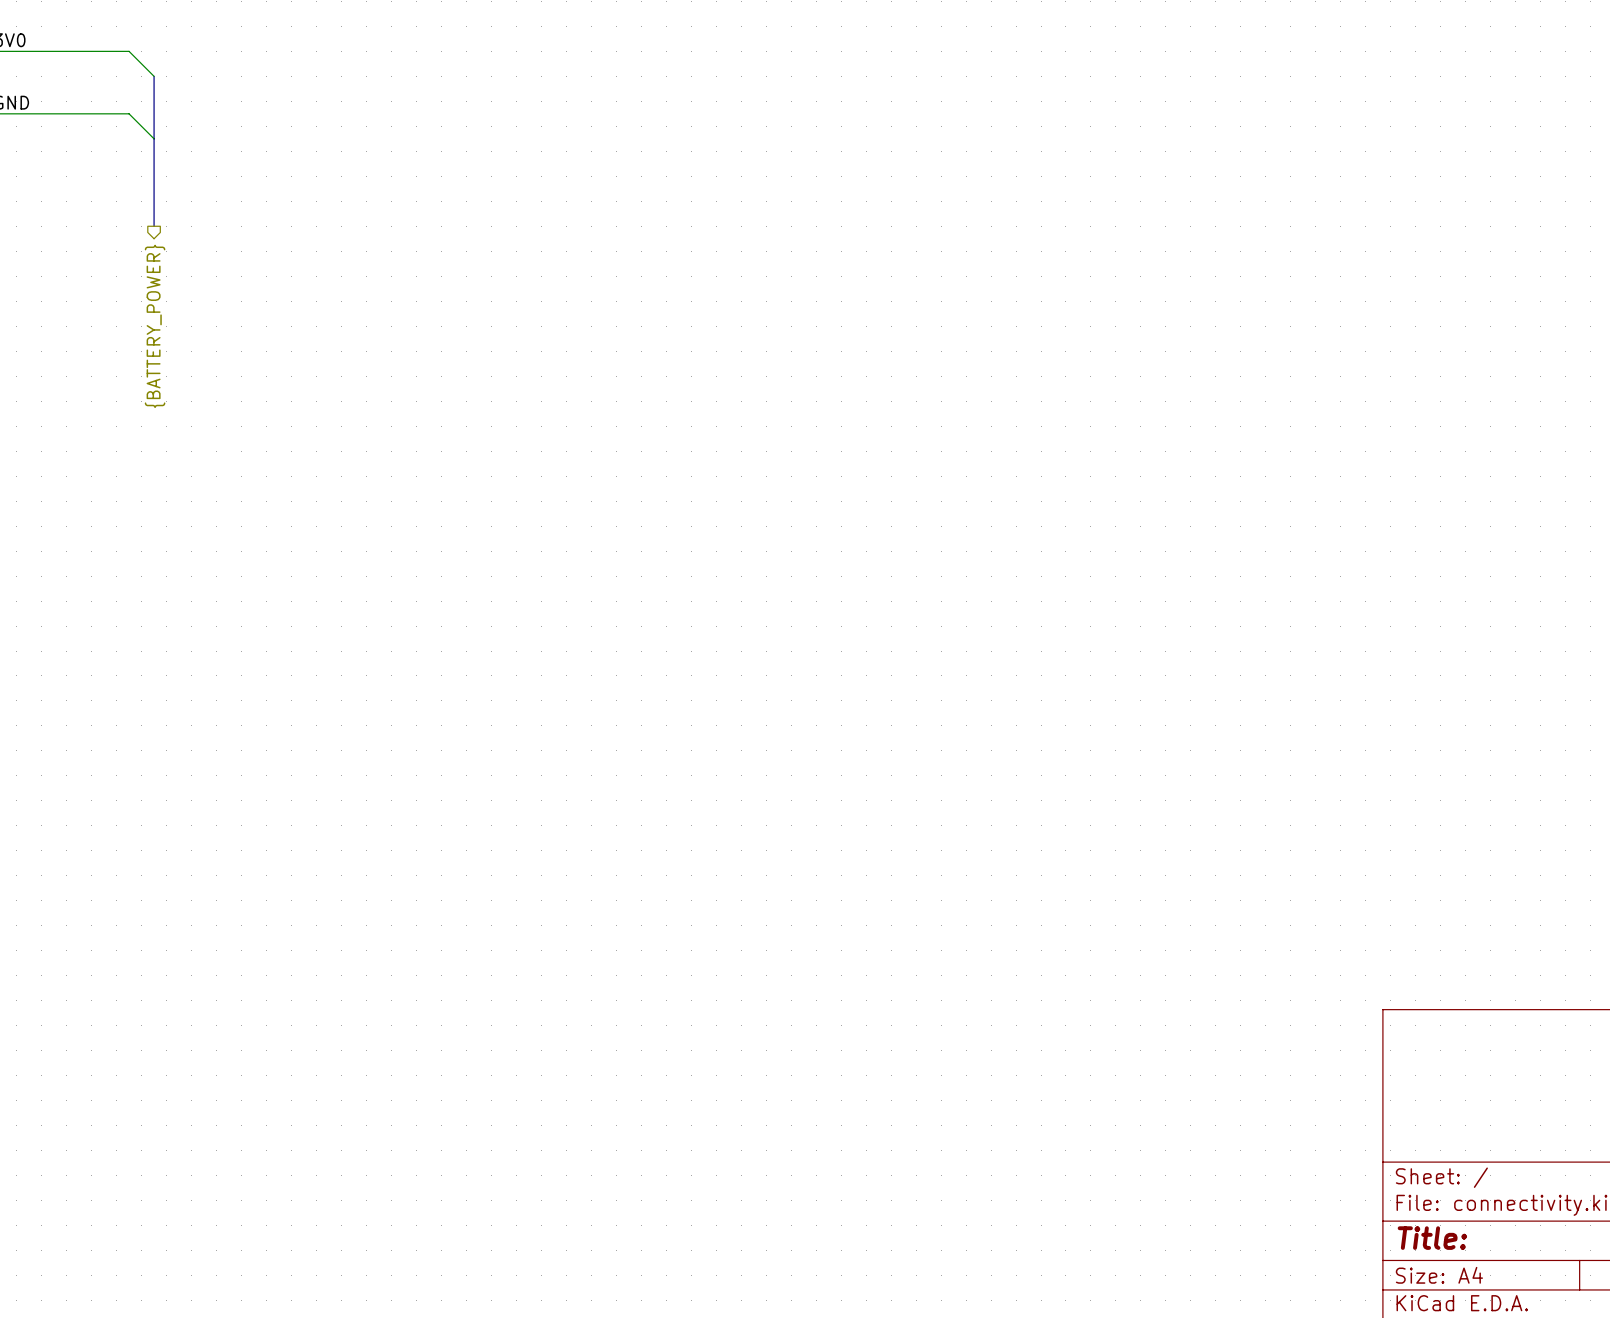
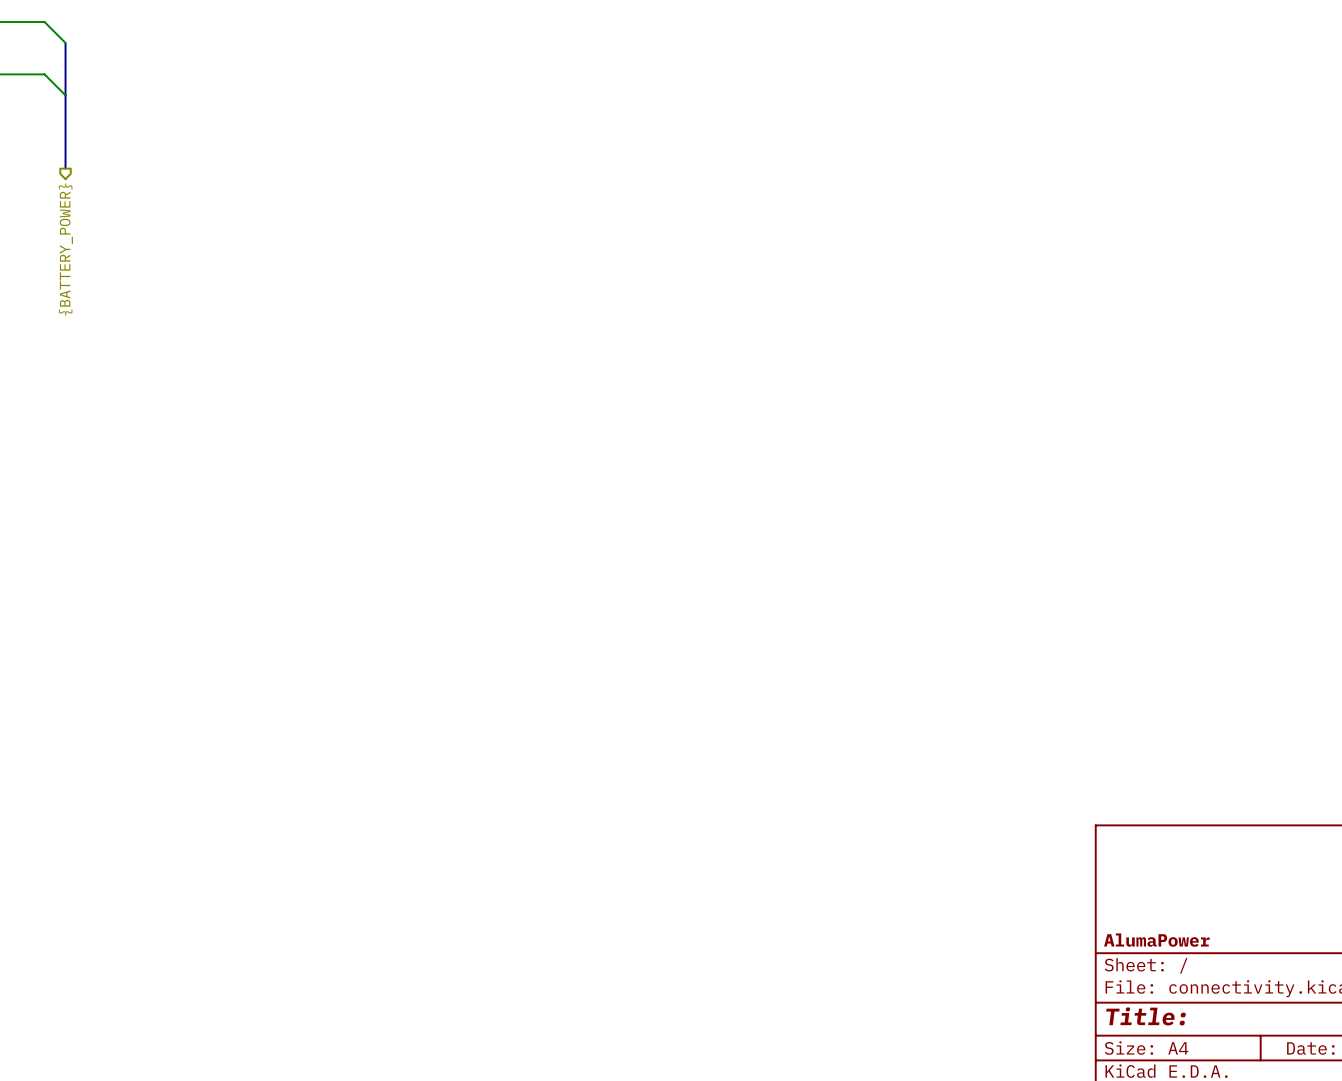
title block: none -> AlumaPower (1156, 940)

